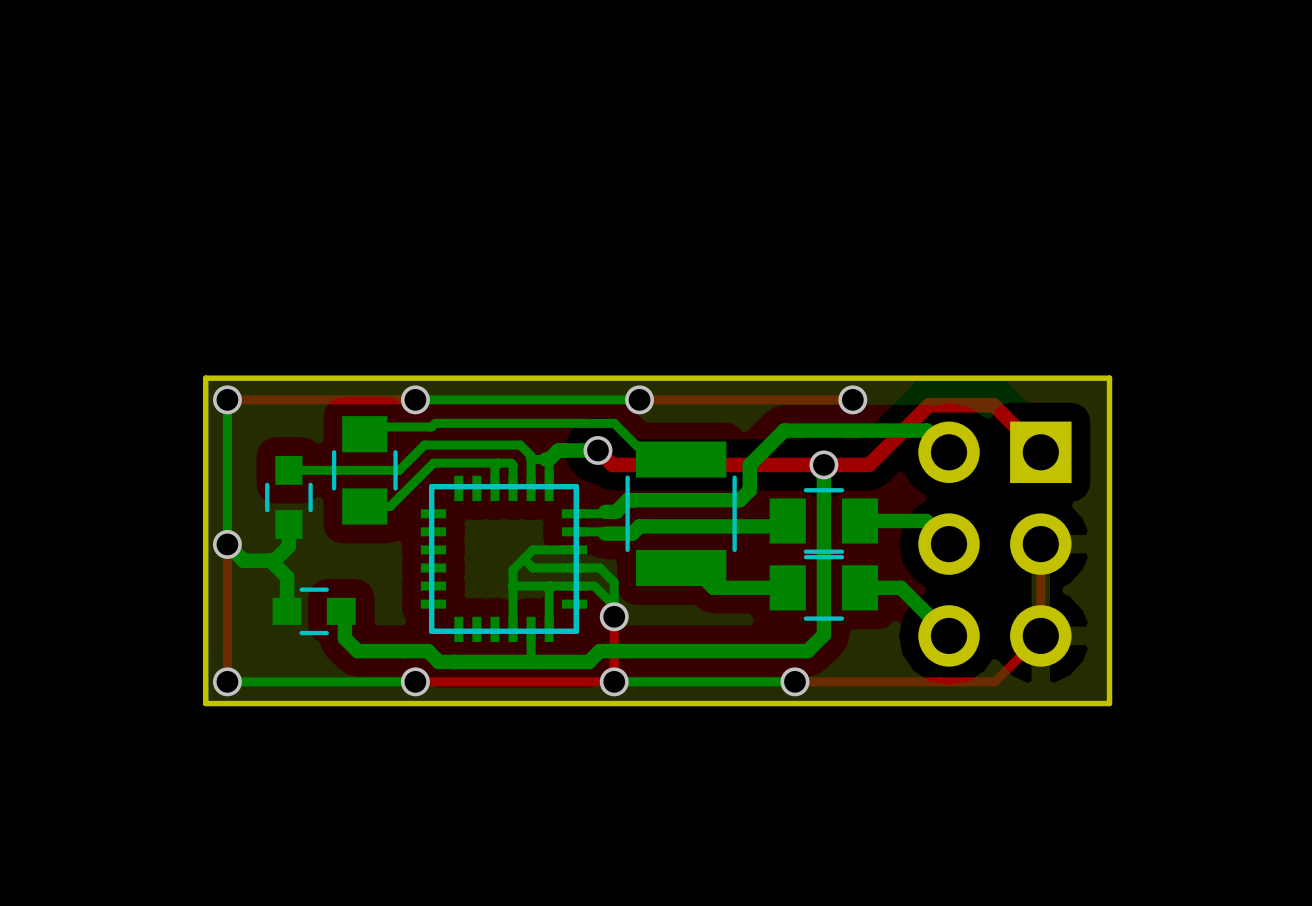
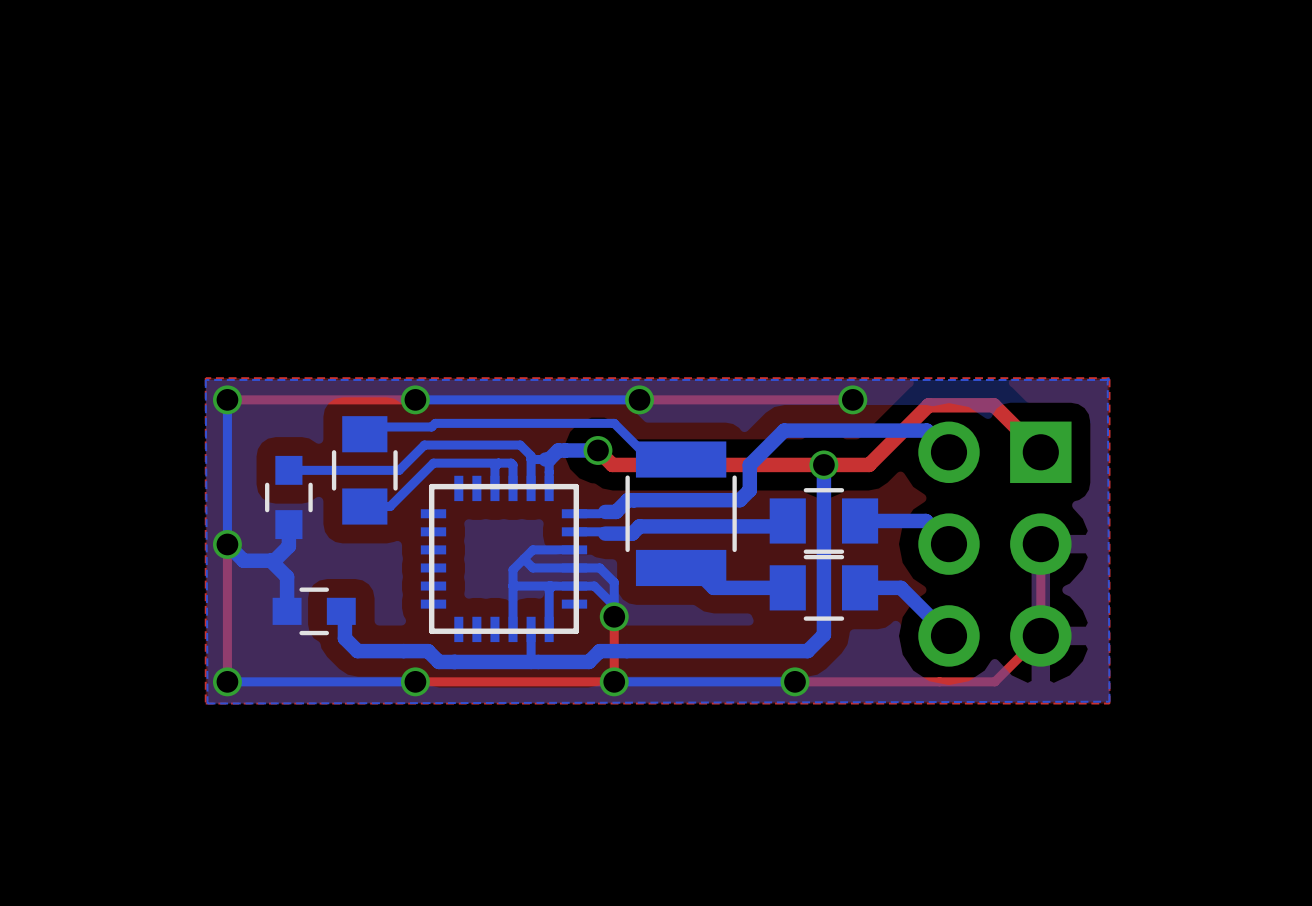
board edge: (1109, 378) (1109, 703) (205, 703) (205, 378) (1109, 378) -> none

